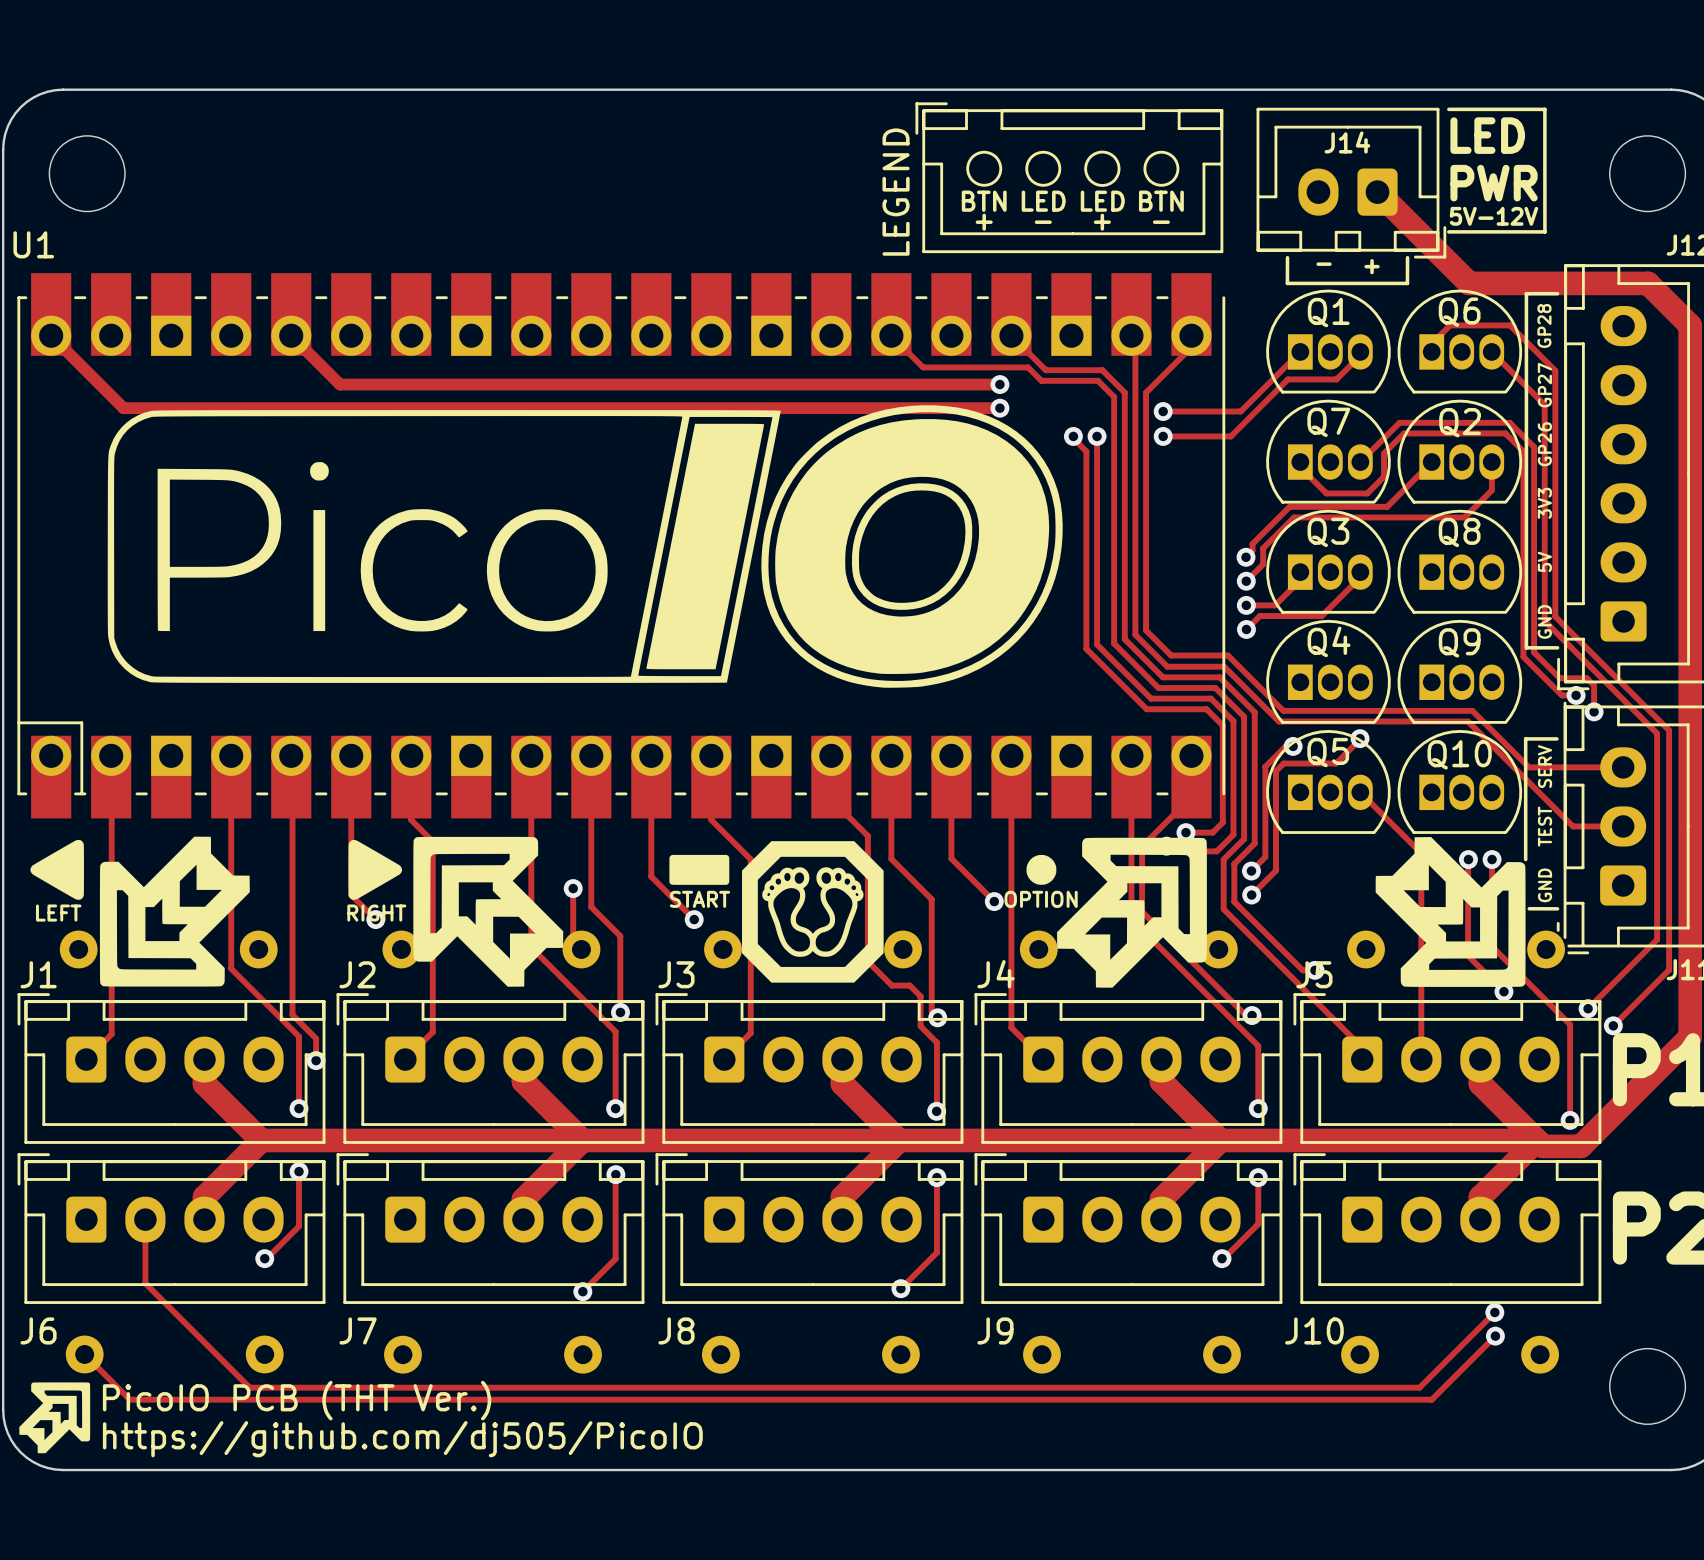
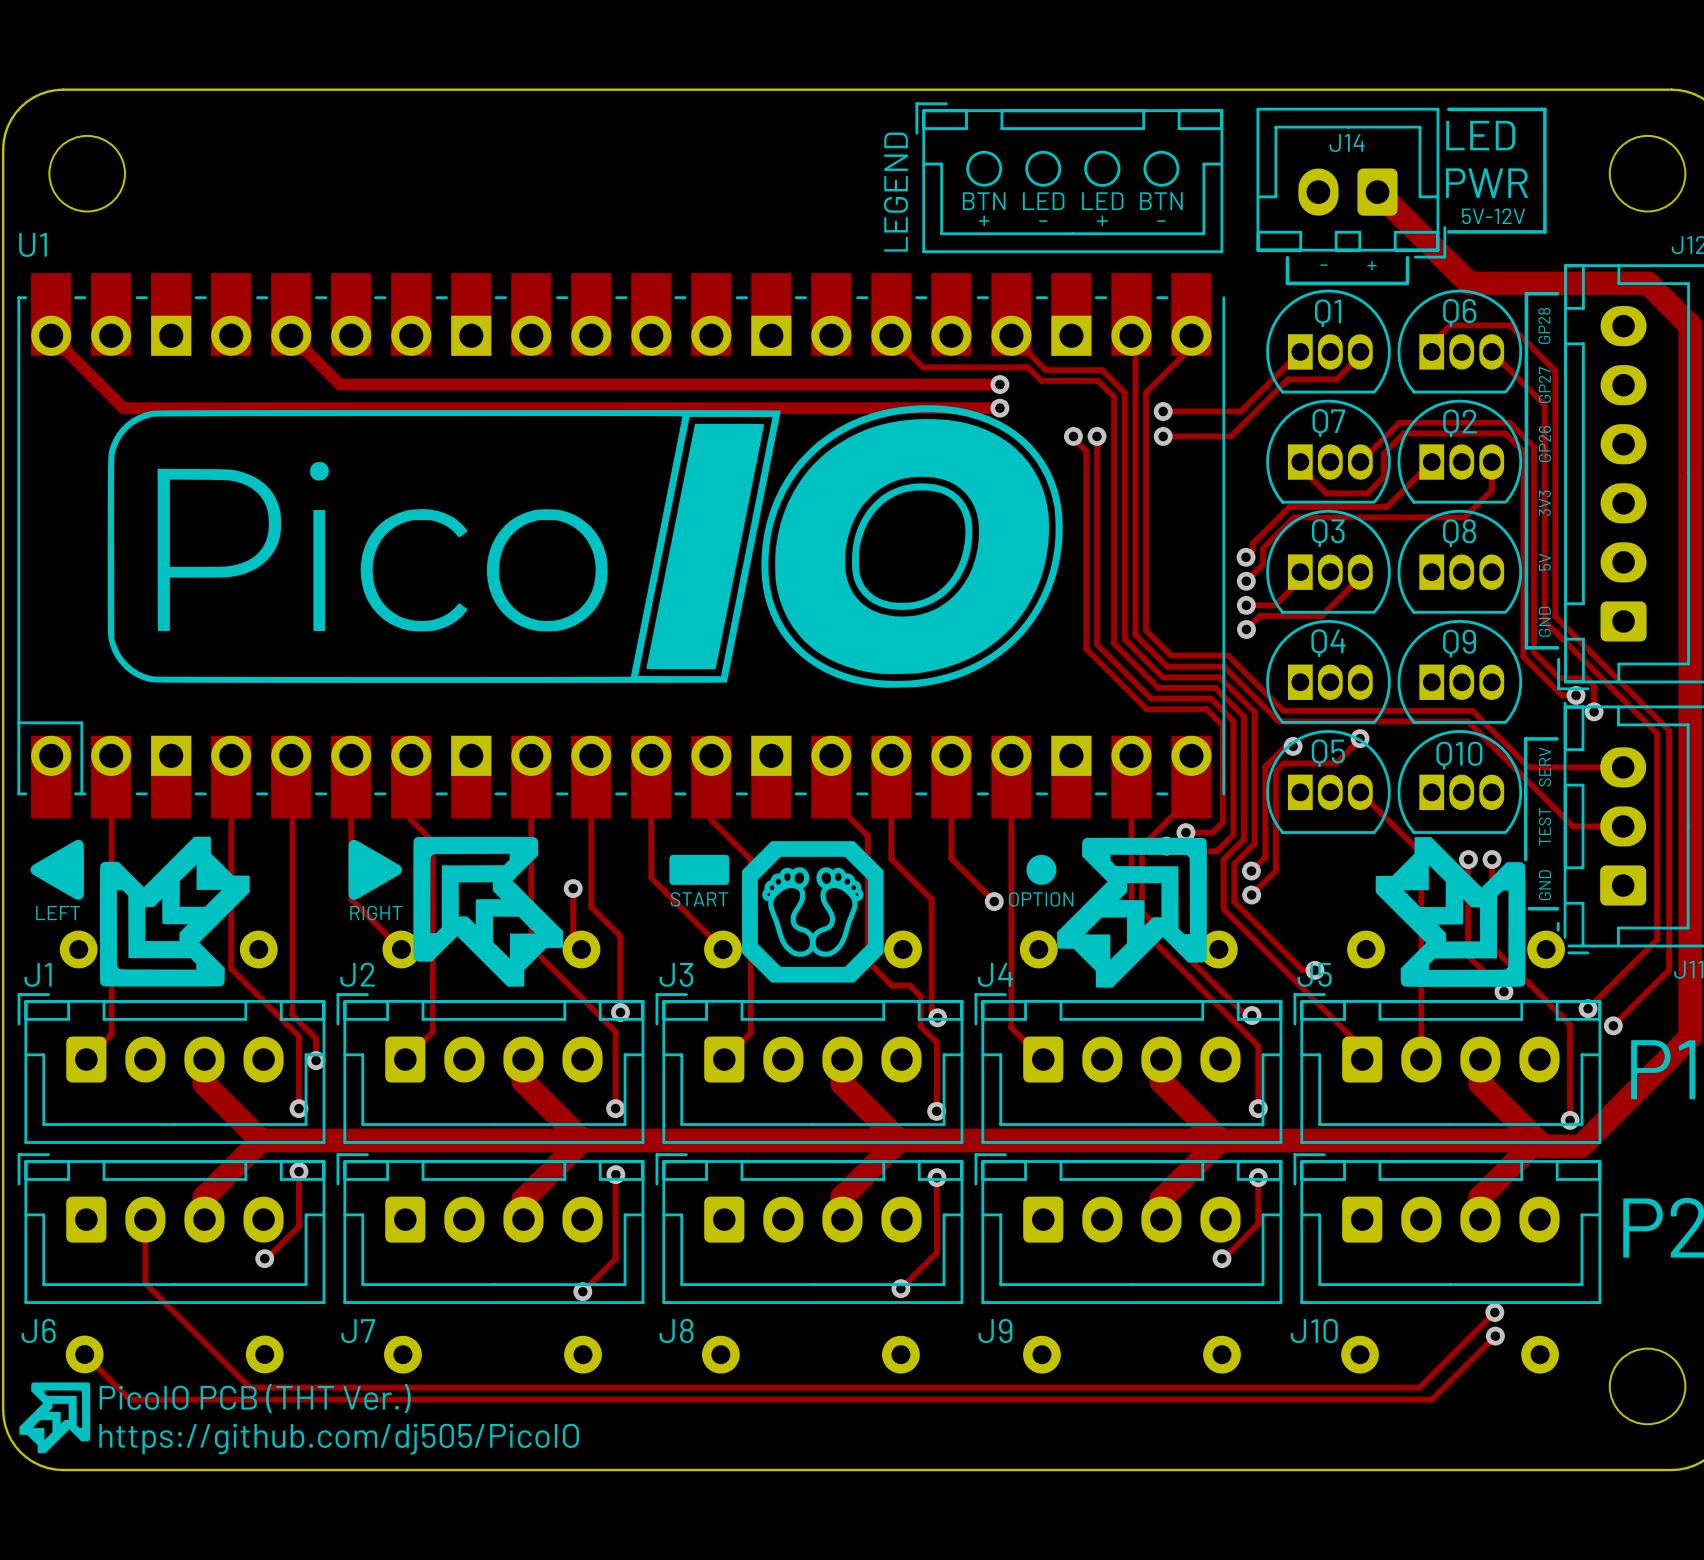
track: (651, 876) (694, 919) -> (651, 876) (723, 949)
track: (351, 895) (375, 919) -> (351, 895) (351, 899) (401, 949)
via: (375, 919) -> none
via: (694, 919) -> none

